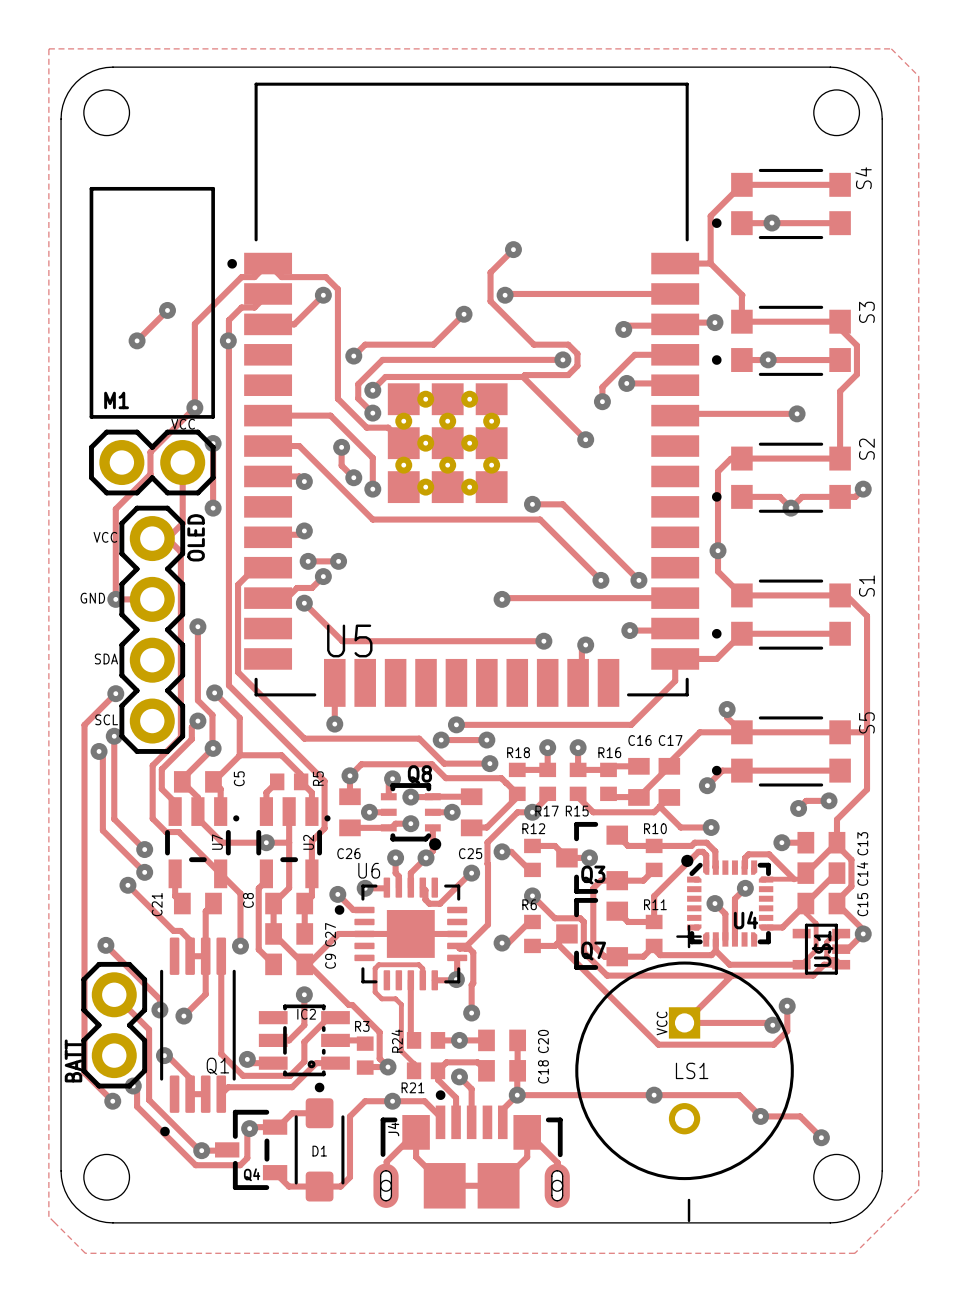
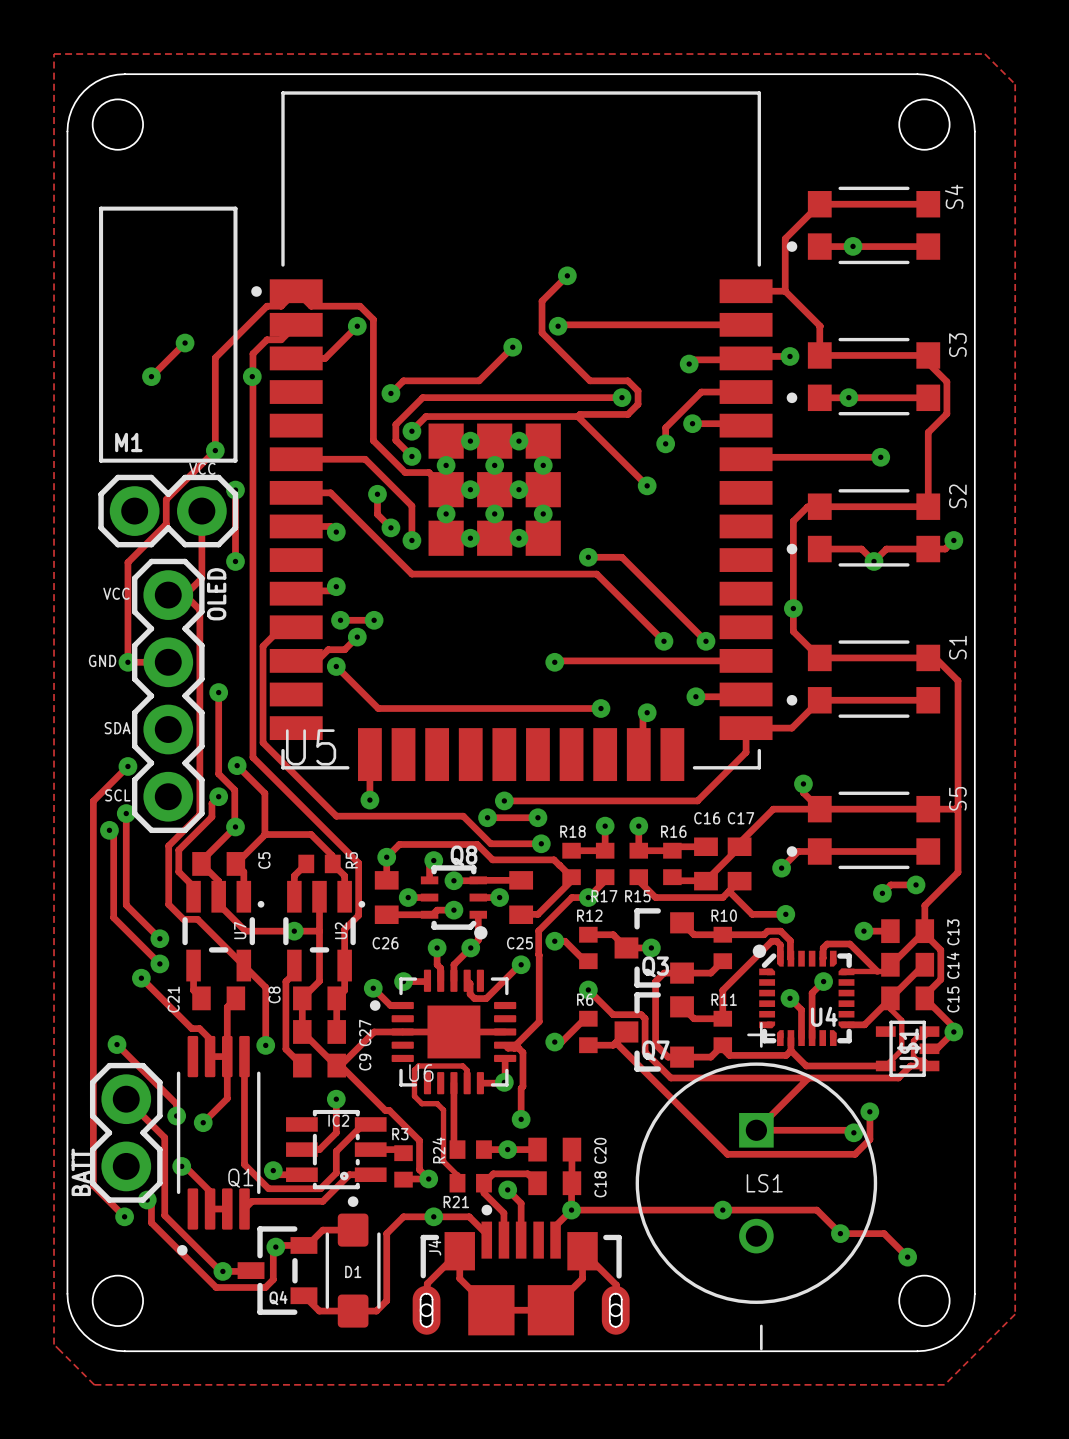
U5 name position: U5 (349, 640) -> U5 (311, 747)
U6 name position: U6 (369, 870) -> U6 (421, 1073)
text: VCC (662, 1023) -> none

